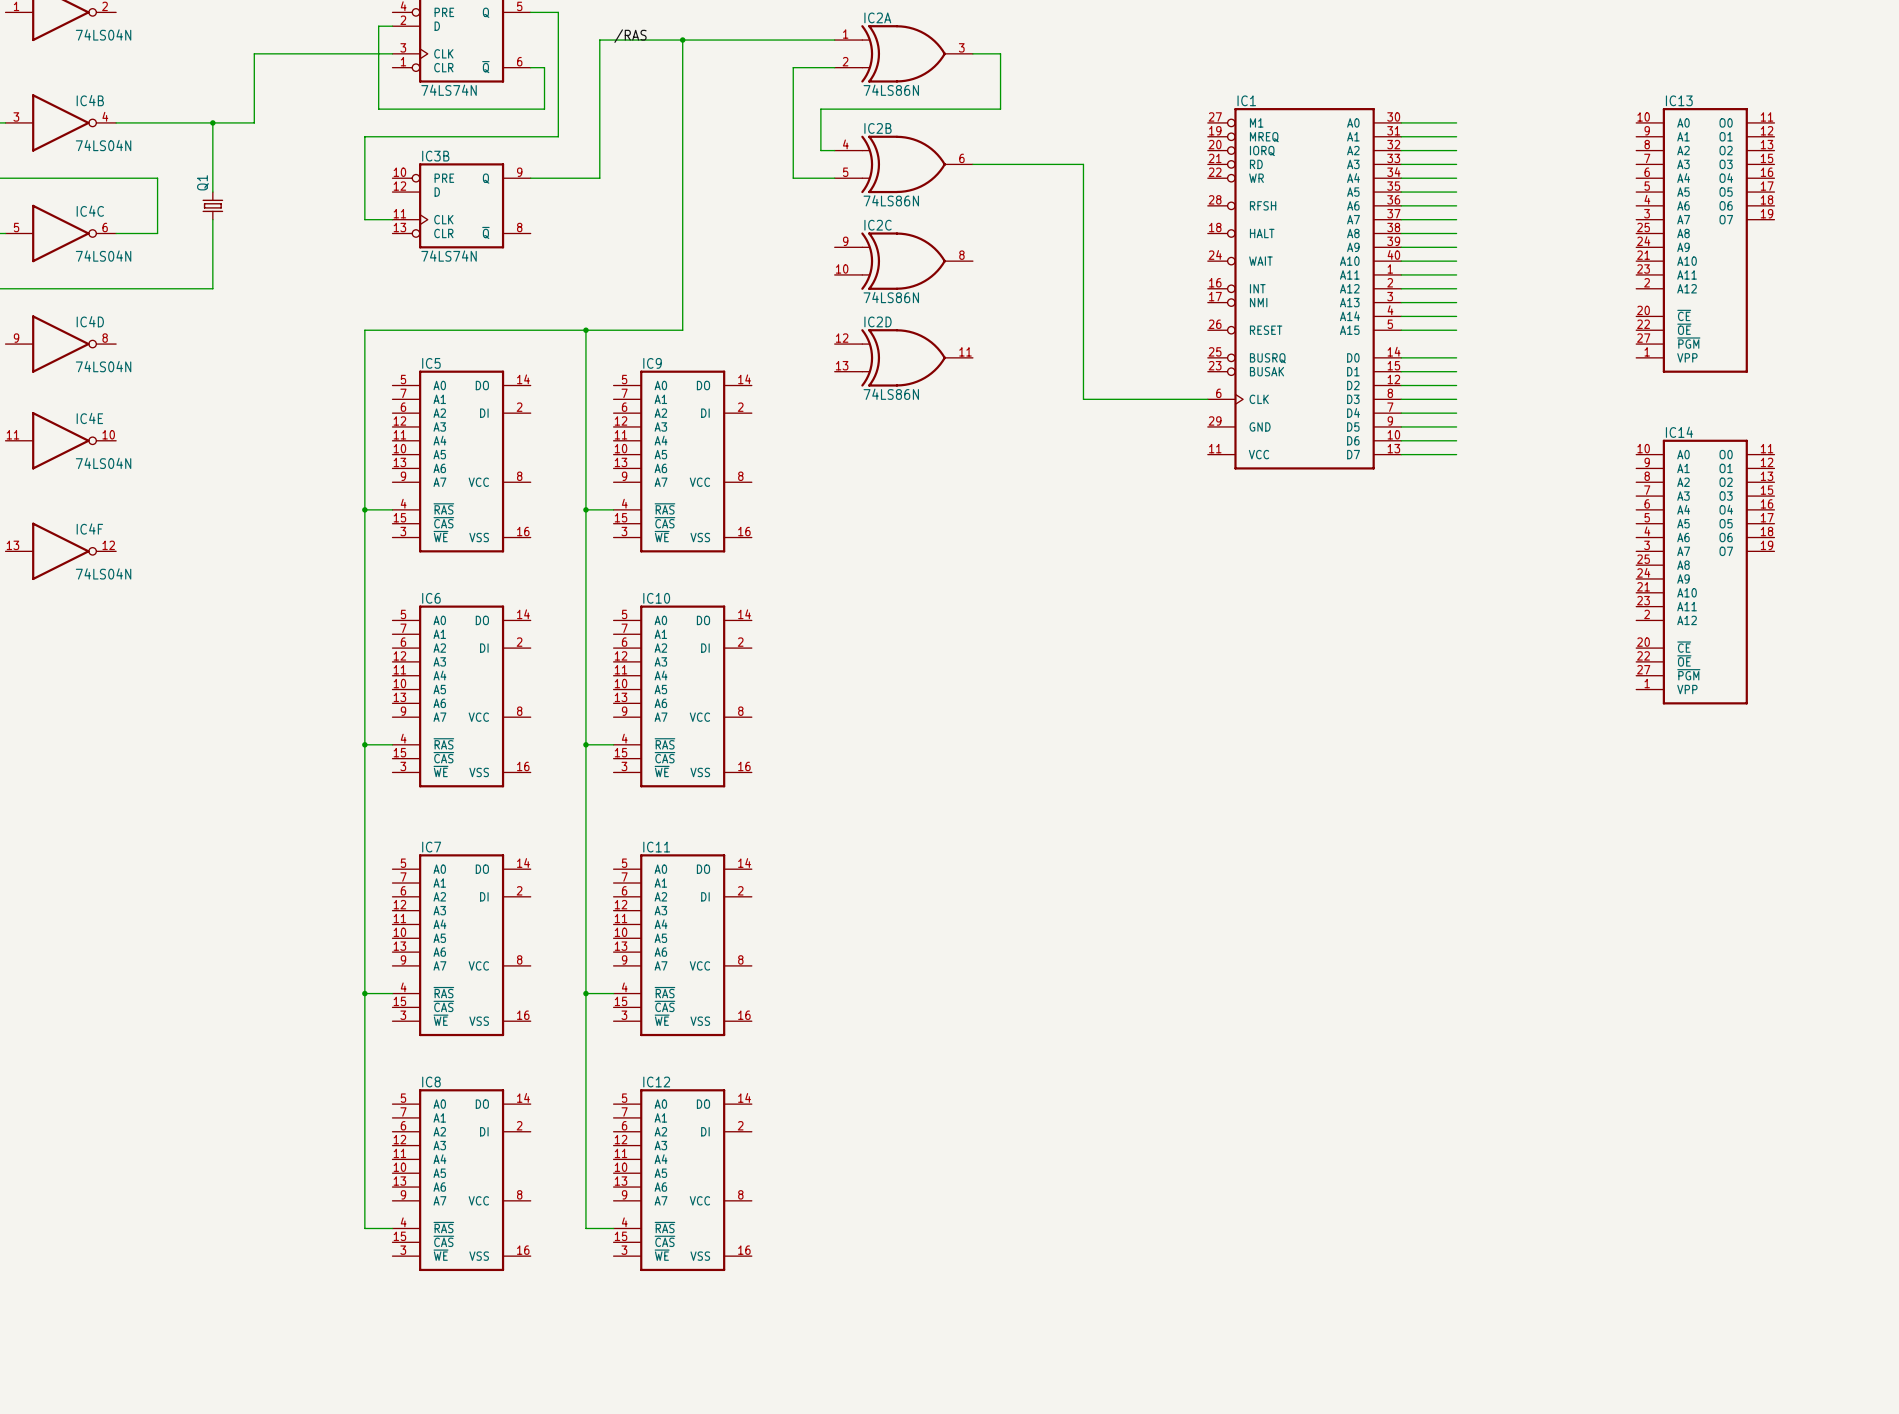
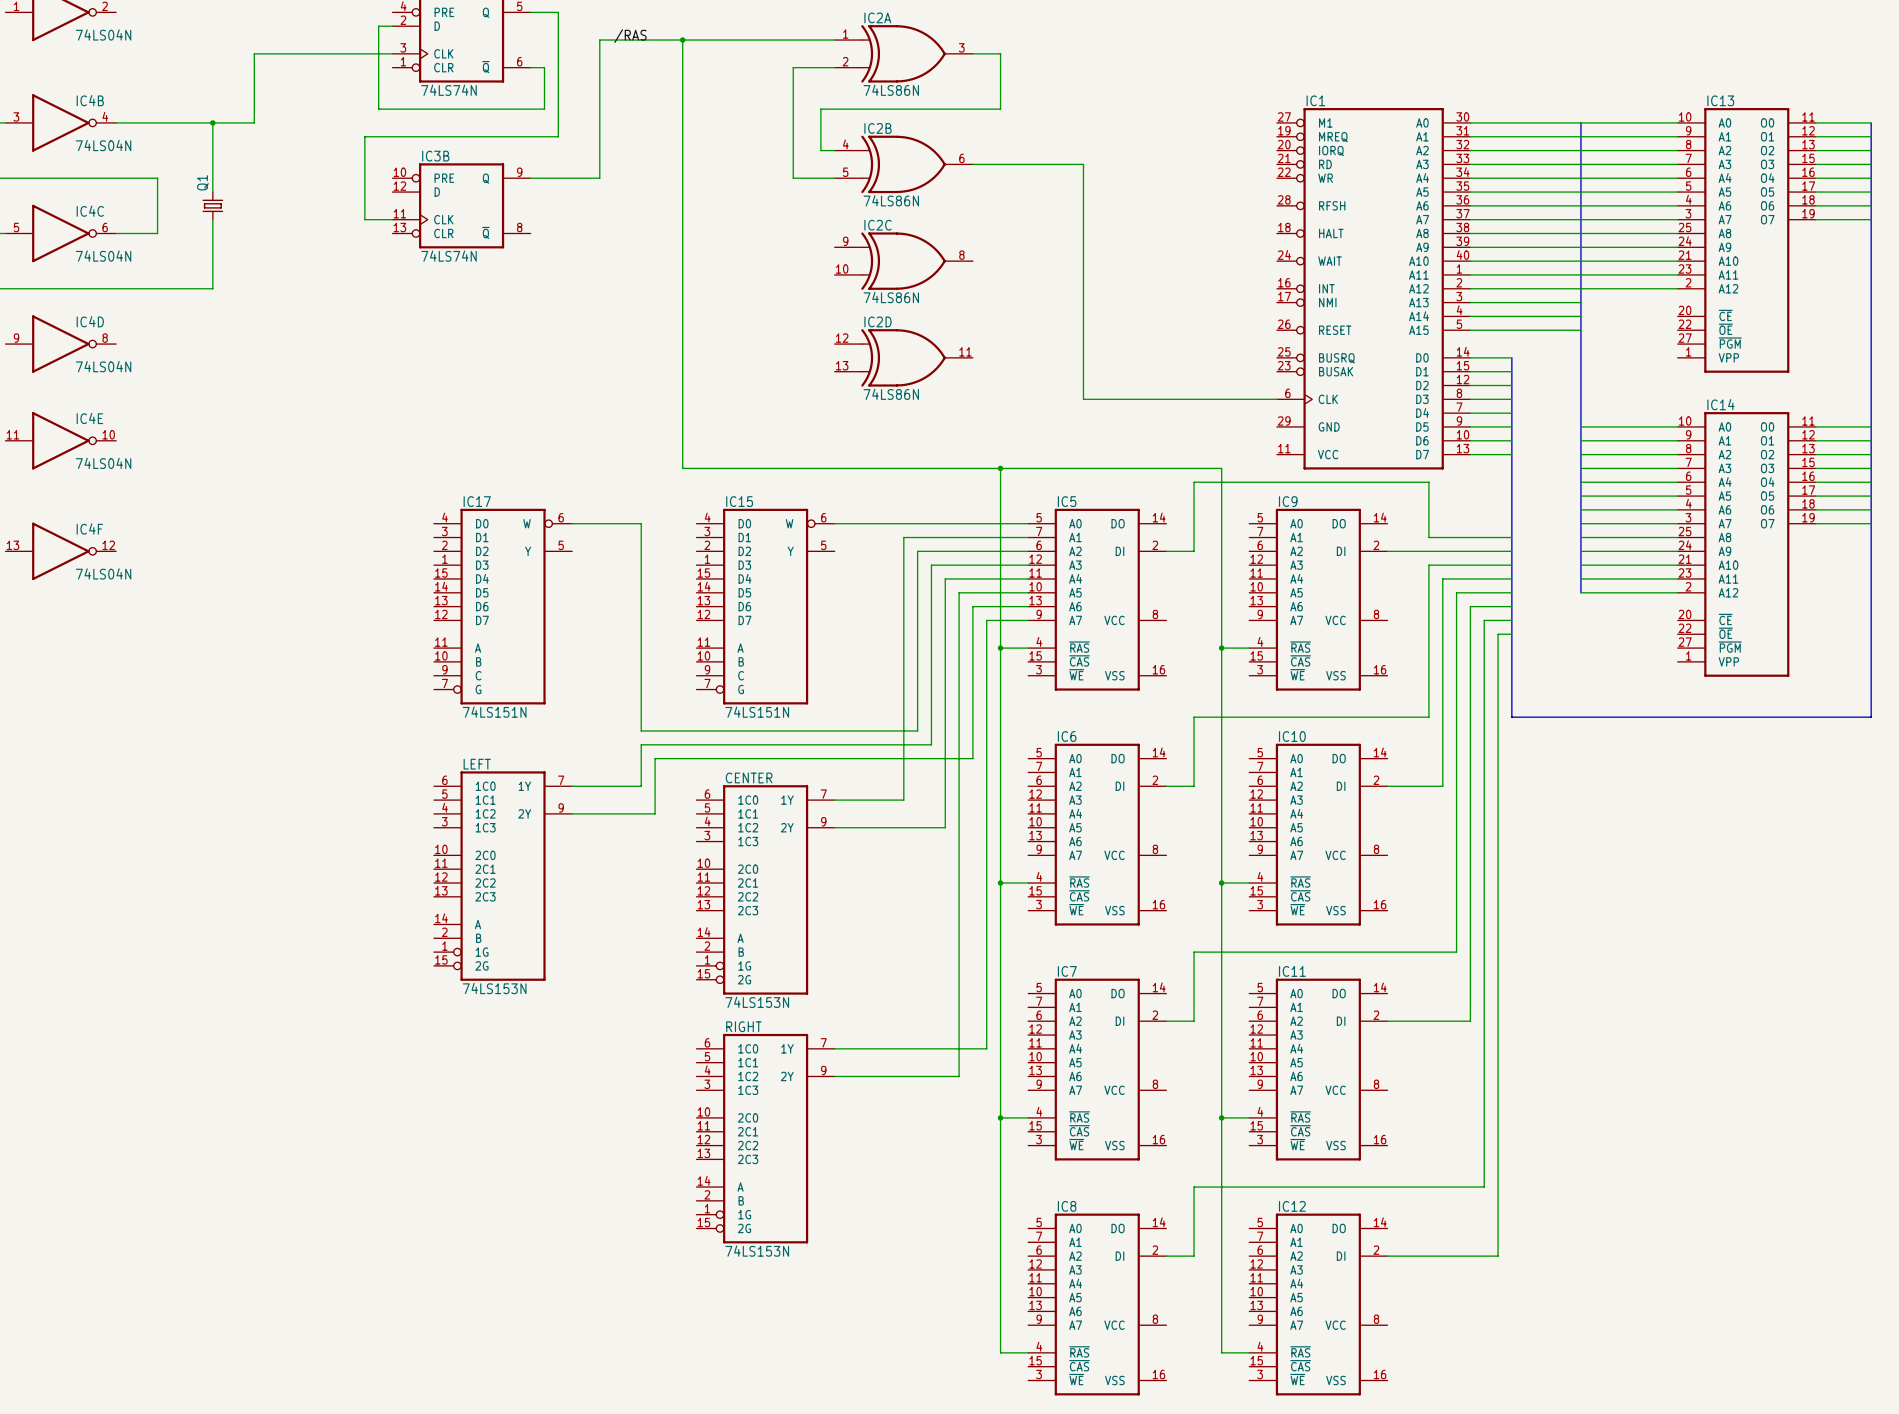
wire: (1401, 122) (1456, 122) -> none
wire: none -> (1470, 122) (1677, 122)
bus: none -> (1580, 122) (1580, 592)
wire: none -> (1815, 122) (1871, 122)
bus: none -> (1871, 122) (1871, 717) (1511, 717) (1511, 357)
wire: (1401, 136) (1456, 136) -> none
wire: none -> (1470, 136) (1677, 136)
wire: none -> (1815, 136) (1871, 136)
wire: (1401, 150) (1456, 150) -> none
wire: none -> (1470, 150) (1677, 150)
wire: none -> (1815, 150) (1871, 150)
wire: (1401, 164) (1456, 164) -> none
wire: none -> (1470, 164) (1677, 164)
wire: none -> (1815, 164) (1871, 164)
wire: (1401, 178) (1456, 178) -> none
wire: none -> (1470, 178) (1677, 178)
wire: none -> (1815, 178) (1871, 178)
wire: (1401, 192) (1456, 192) -> none
wire: none -> (1470, 192) (1677, 192)
wire: none -> (1815, 192) (1871, 192)
wire: (1401, 205) (1456, 205) -> none
wire: none -> (1470, 205) (1677, 205)
wire: none -> (1815, 205) (1871, 205)
wire: (1401, 219) (1456, 219) -> none
wire: none -> (1470, 219) (1677, 219)
wire: none -> (1815, 219) (1871, 219)
wire: (1401, 233) (1456, 233) -> none
wire: none -> (1470, 233) (1677, 233)
IC13 position: (1705, 240) -> (1746, 240)
wire: (1401, 247) (1456, 247) -> none
wire: none -> (1470, 247) (1677, 247)
wire: (1401, 261) (1456, 261) -> none
wire: none -> (1470, 261) (1677, 261)
wire: (1401, 274) (1456, 274) -> none
wire: none -> (1470, 274) (1677, 274)
IC1 position: (1304, 288) -> (1373, 288)
wire: (1401, 288) (1456, 288) -> none
wire: none -> (1470, 288) (1677, 288)
wire: (1401, 302) (1456, 302) -> none
wire: none -> (1470, 302) (1580, 302)
wire: (1401, 316) (1456, 316) -> none
wire: none -> (1470, 316) (1580, 316)
wire: (585, 330) (585, 1228) (613, 1228) -> none
junction: (585, 330) -> none
wire: (682, 330) (364, 330) (364, 1228) (392, 1228) -> (682, 330) (682, 468) (1221, 468) (1221, 1352) (1249, 1352)
wire: (1401, 330) (1456, 330) -> none
wire: none -> (1470, 330) (1580, 330)
wire: (1401, 357) (1456, 357) -> none
wire: none -> (1470, 357) (1511, 357)
wire: (1401, 371) (1456, 371) -> none
wire: none -> (1470, 371) (1511, 371)
wire: (1401, 385) (1456, 385) -> none
wire: none -> (1470, 385) (1511, 385)
wire: (1401, 399) (1456, 399) -> none
wire: none -> (1470, 399) (1511, 399)
wire: (1401, 413) (1456, 413) -> none
wire: none -> (1470, 413) (1511, 413)
wire: (1401, 426) (1456, 426) -> none
wire: none -> (1470, 426) (1511, 426)
wire: none -> (1580, 426) (1677, 426)
wire: none -> (1815, 426) (1871, 426)
wire: (1401, 440) (1456, 440) -> none
wire: none -> (1470, 440) (1511, 440)
wire: none -> (1580, 440) (1677, 440)
wire: none -> (1815, 440) (1871, 440)
wire: (1401, 454) (1456, 454) -> none
wire: none -> (1470, 454) (1511, 454)
wire: none -> (1580, 454) (1677, 454)
wire: none -> (1815, 454) (1871, 454)
IC5 position: (461, 461) -> (1097, 599)
IC9 position: (682, 461) -> (1318, 599)
wire: none -> (1000, 468) (1000, 1352) (1028, 1352)
junction: none -> (1000, 468)
wire: none -> (1580, 468) (1677, 468)
wire: none -> (1815, 468) (1871, 468)
wire: none -> (1580, 482) (1677, 482)
wire: none -> (1815, 482) (1871, 482)
wire: none -> (1580, 496) (1677, 496)
wire: none -> (1815, 496) (1871, 496)
wire: (364, 509) (392, 509) -> none
junction: (364, 509) -> none
wire: (585, 509) (613, 509) -> none
junction: (585, 509) -> none
wire: none -> (1580, 509) (1677, 509)
wire: none -> (1815, 509) (1871, 509)
wire: none -> (572, 523) (641, 523) (641, 730) (917, 730) (917, 551) (1028, 551)
wire: none -> (834, 523) (1028, 523)
wire: none -> (1580, 523) (1677, 523)
wire: none -> (1815, 523) (1871, 523)
wire: none -> (1028, 537) (903, 537) (903, 800) (834, 800)
wire: none -> (1511, 537) (1428, 537) (1428, 482) (1194, 482) (1194, 551) (1166, 551)
wire: none -> (1580, 537) (1677, 537)
wire: none -> (1387, 551) (1511, 551)
wire: none -> (1580, 551) (1677, 551)
wire: none -> (1028, 565) (931, 565) (931, 744) (641, 744) (641, 786) (572, 786)
wire: none -> (1511, 565) (1428, 565) (1428, 717) (1194, 717) (1194, 786) (1166, 786)
wire: none -> (1580, 565) (1677, 565)
IC14 position: (1705, 572) -> (1746, 544)
wire: none -> (1028, 578) (945, 578) (945, 827) (834, 827)
wire: none -> (1511, 578) (1442, 578) (1442, 786) (1387, 786)
wire: none -> (1580, 578) (1677, 578)
wire: none -> (1028, 592) (959, 592) (959, 1076) (834, 1076)
wire: none -> (1511, 592) (1456, 592) (1456, 952) (1194, 952) (1194, 1021) (1166, 1021)
wire: none -> (1580, 592) (1677, 592)
IC17: none -> 74LS151N (503, 606)
IC15: none -> 74LS151N (765, 606)
wire: none -> (1028, 606) (972, 606) (972, 758) (655, 758) (655, 813) (572, 813)
wire: none -> (1511, 606) (1470, 606) (1470, 1021) (1387, 1021)
wire: none -> (1028, 620) (986, 620) (986, 1048) (834, 1048)
wire: none -> (1511, 620) (1484, 620) (1484, 1187) (1194, 1187) (1194, 1256) (1166, 1256)
wire: none -> (1511, 634) (1498, 634) (1498, 1256) (1387, 1256)
wire: none -> (1000, 648) (1028, 648)
junction: none -> (1000, 648)
wire: none -> (1221, 648) (1249, 648)
junction: none -> (1221, 648)
IC6 position: (461, 696) -> (1097, 834)
IC10 position: (682, 696) -> (1318, 834)
wire: (364, 744) (392, 744) -> none
junction: (364, 744) -> none
wire: (585, 744) (613, 744) -> none
junction: (585, 744) -> none
LEFT: none -> 74LS153N (503, 876)
wire: none -> (1000, 883) (1028, 883)
junction: none -> (1000, 883)
wire: none -> (1221, 883) (1249, 883)
junction: none -> (1221, 883)
CENTER: none -> 74LS153N (765, 889)
IC7 position: (461, 945) -> (1097, 1069)
IC11 position: (682, 945) -> (1318, 1069)
wire: (364, 993) (392, 993) -> none
junction: (364, 993) -> none
wire: (585, 993) (613, 993) -> none
junction: (585, 993) -> none
wire: none -> (1000, 1117) (1028, 1117)
junction: none -> (1000, 1117)
wire: none -> (1221, 1117) (1249, 1117)
junction: none -> (1221, 1117)
RIGHT: none -> 74LS153N (765, 1138)
IC8 position: (461, 1180) -> (1097, 1304)
IC12 position: (682, 1180) -> (1318, 1304)

